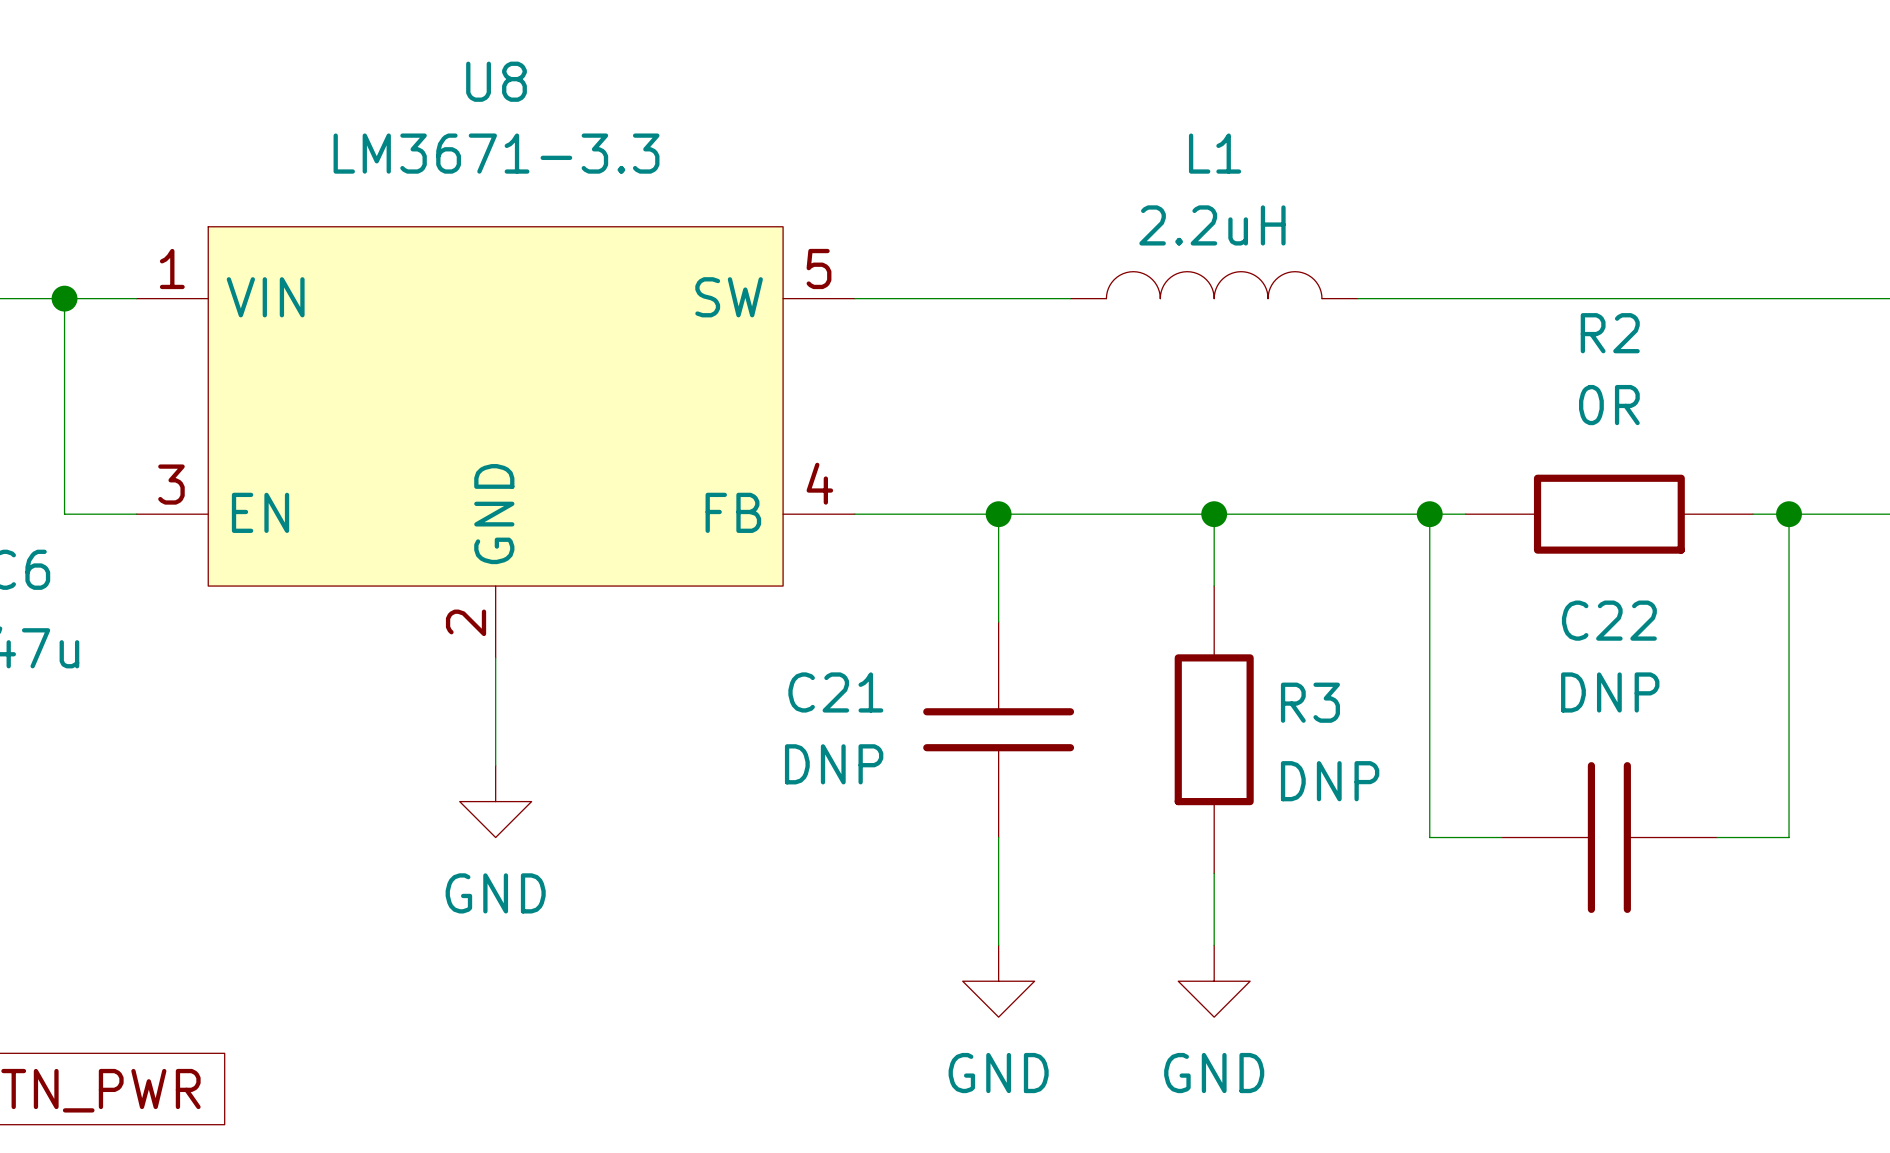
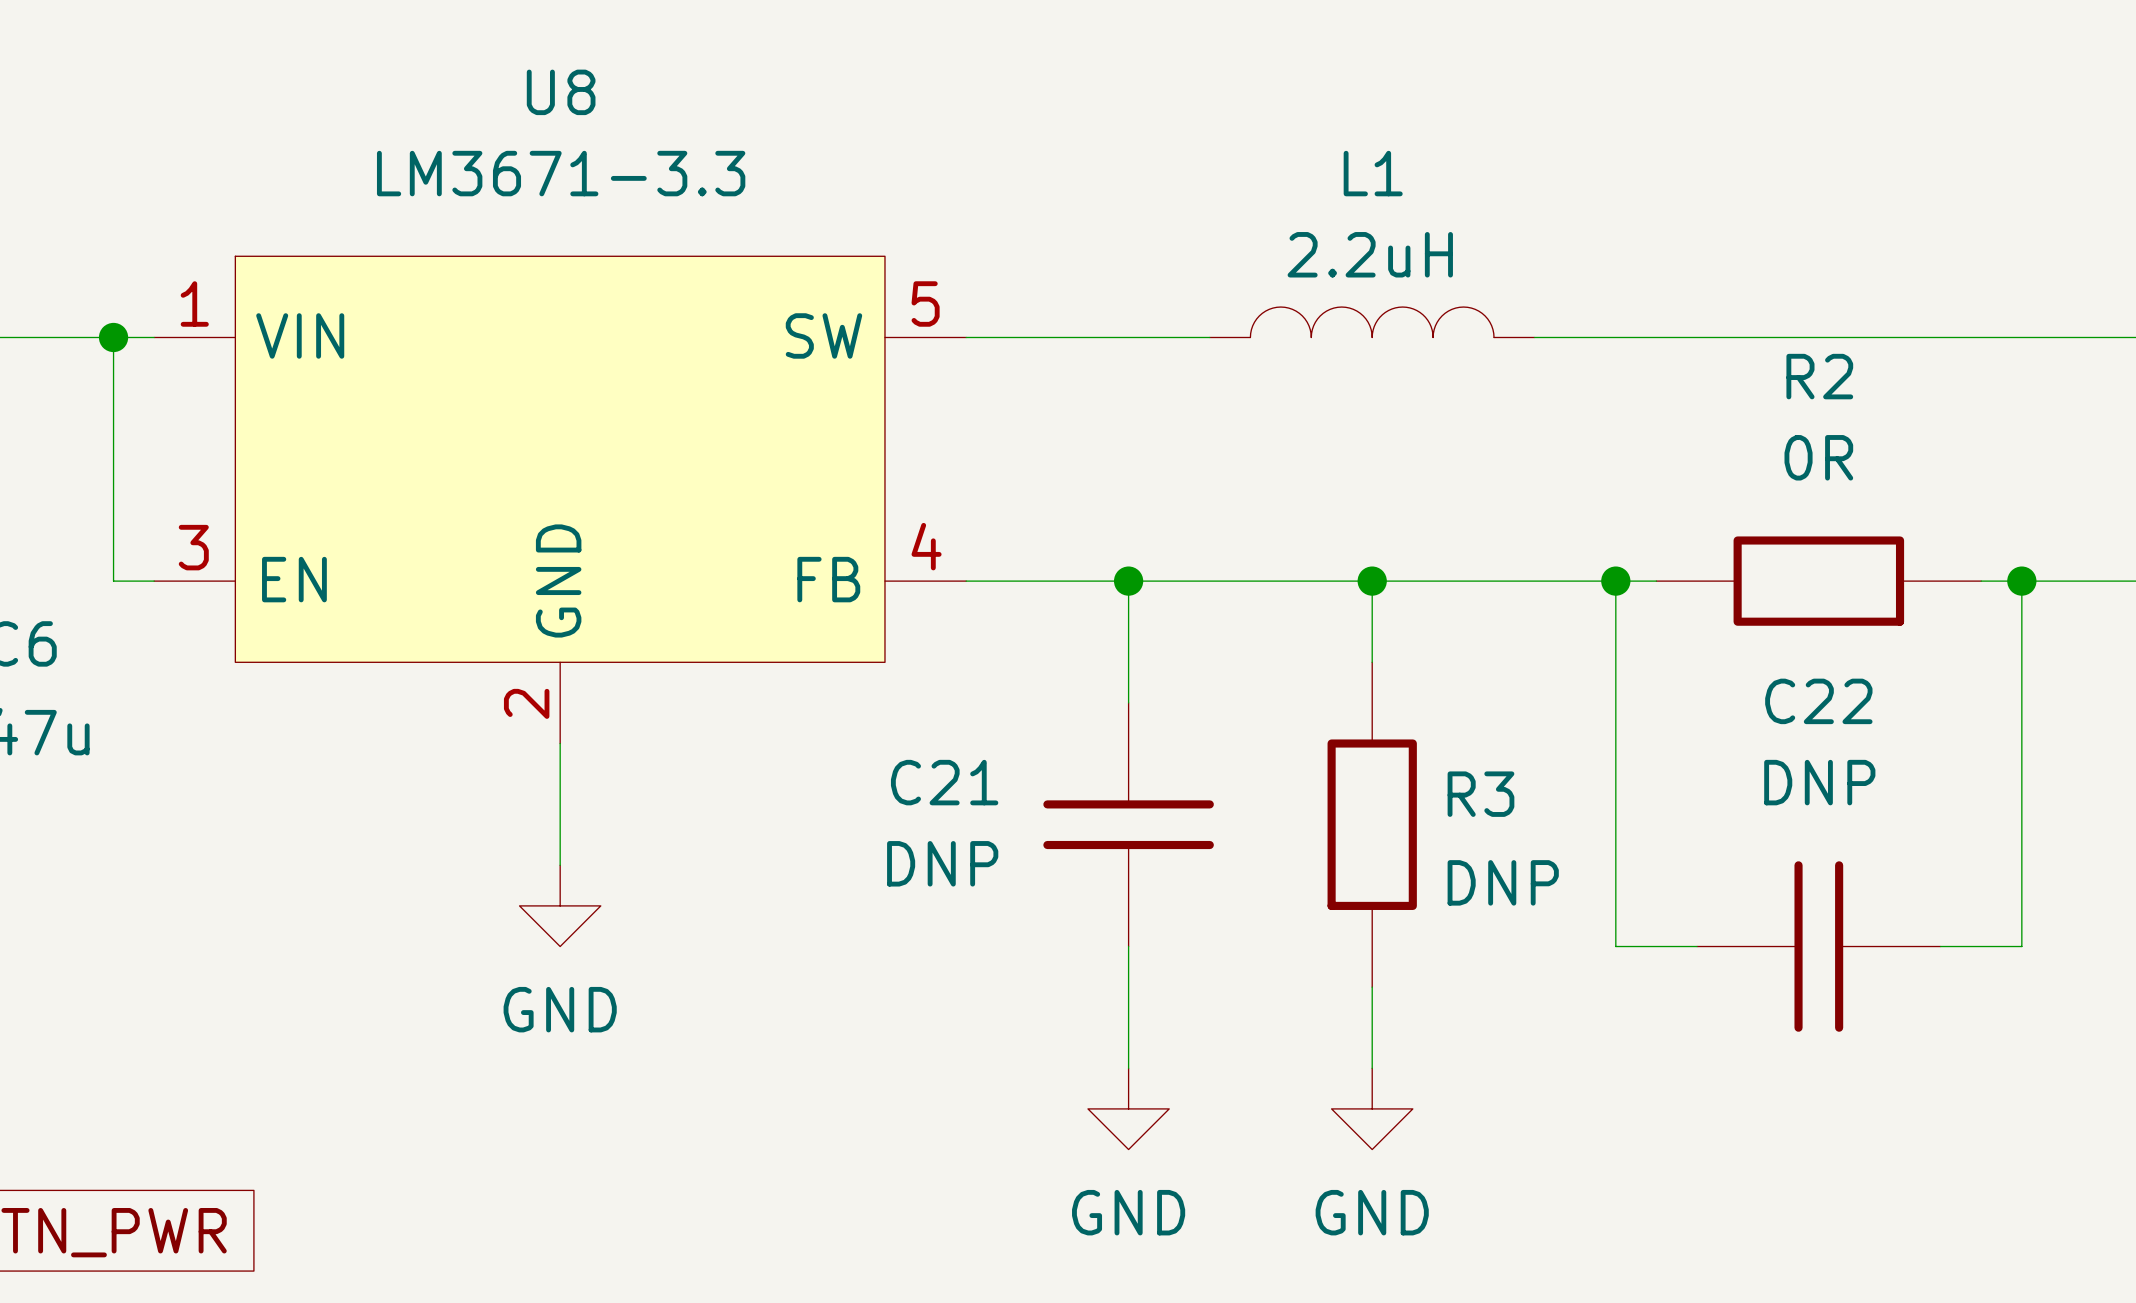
wire: (64, 298) (64, 514) (100, 514) -> (113, 337) (113, 581)
junction position: (64, 298) -> (113, 337)

